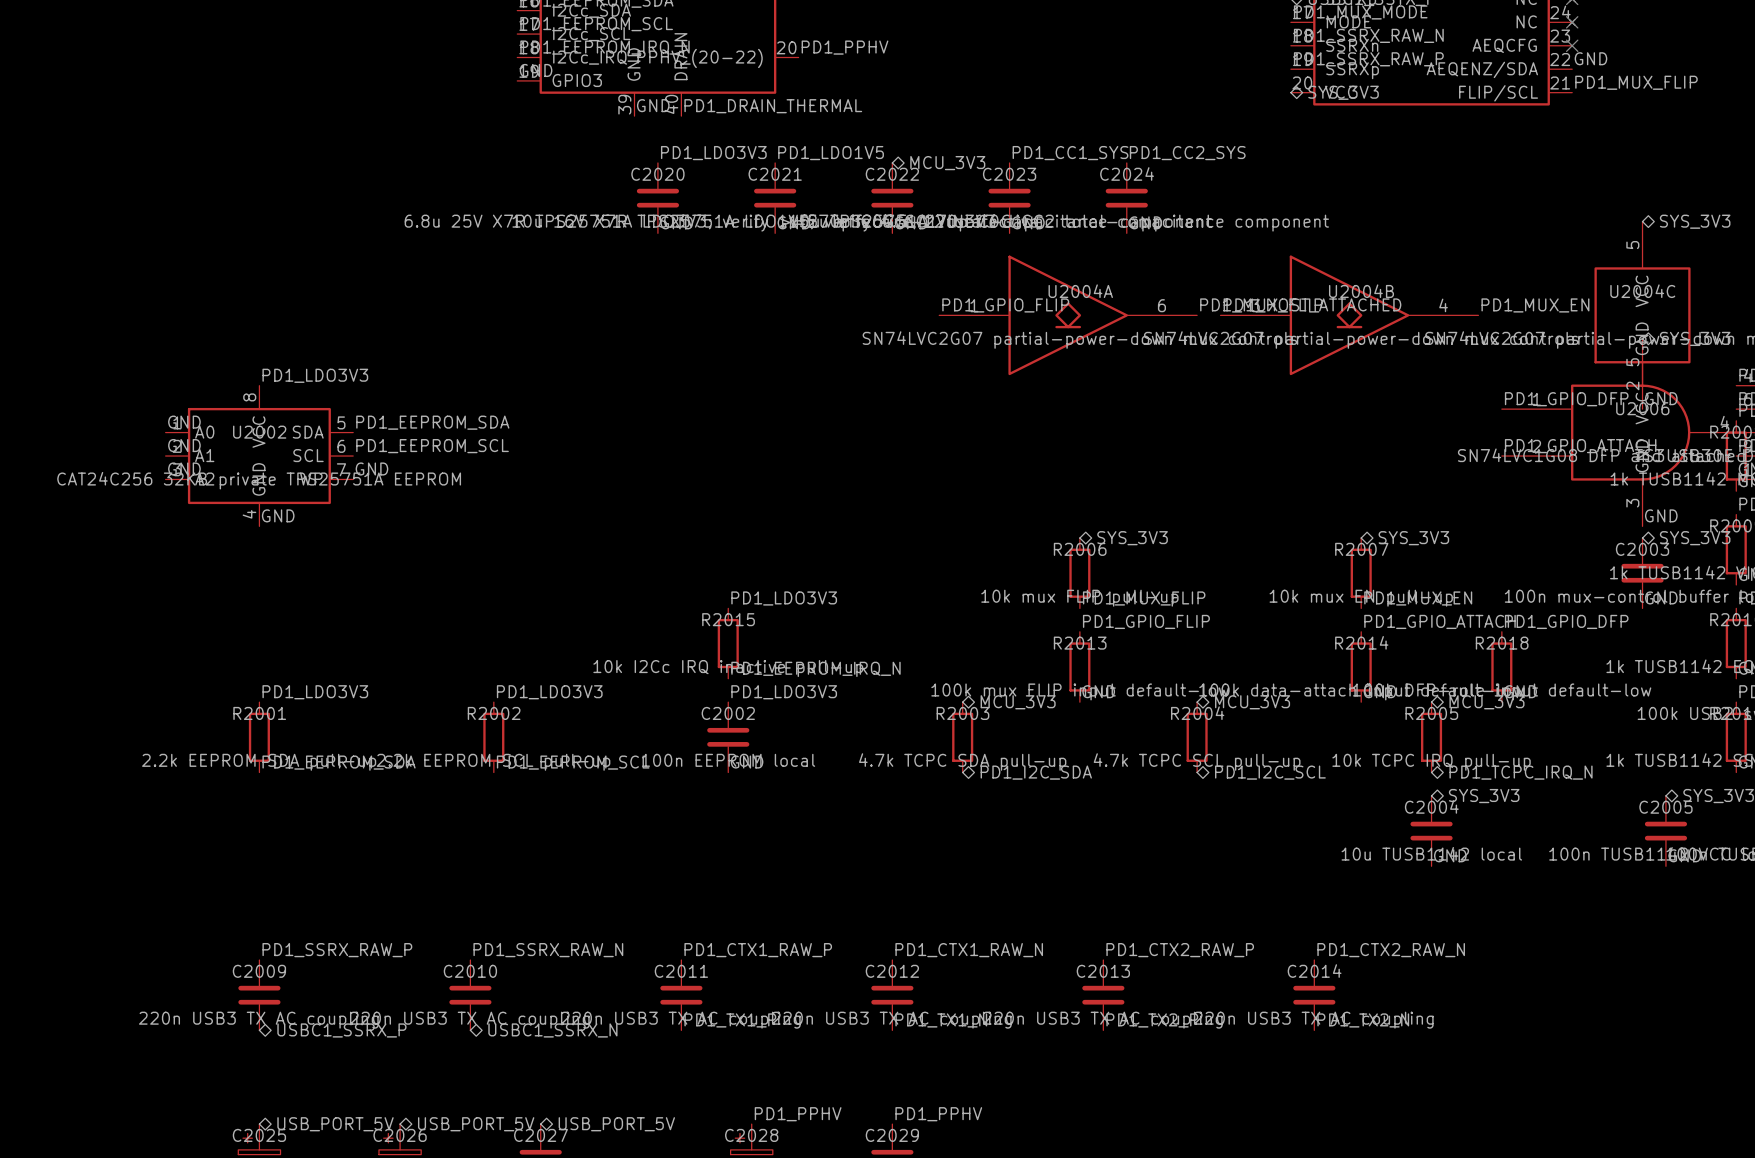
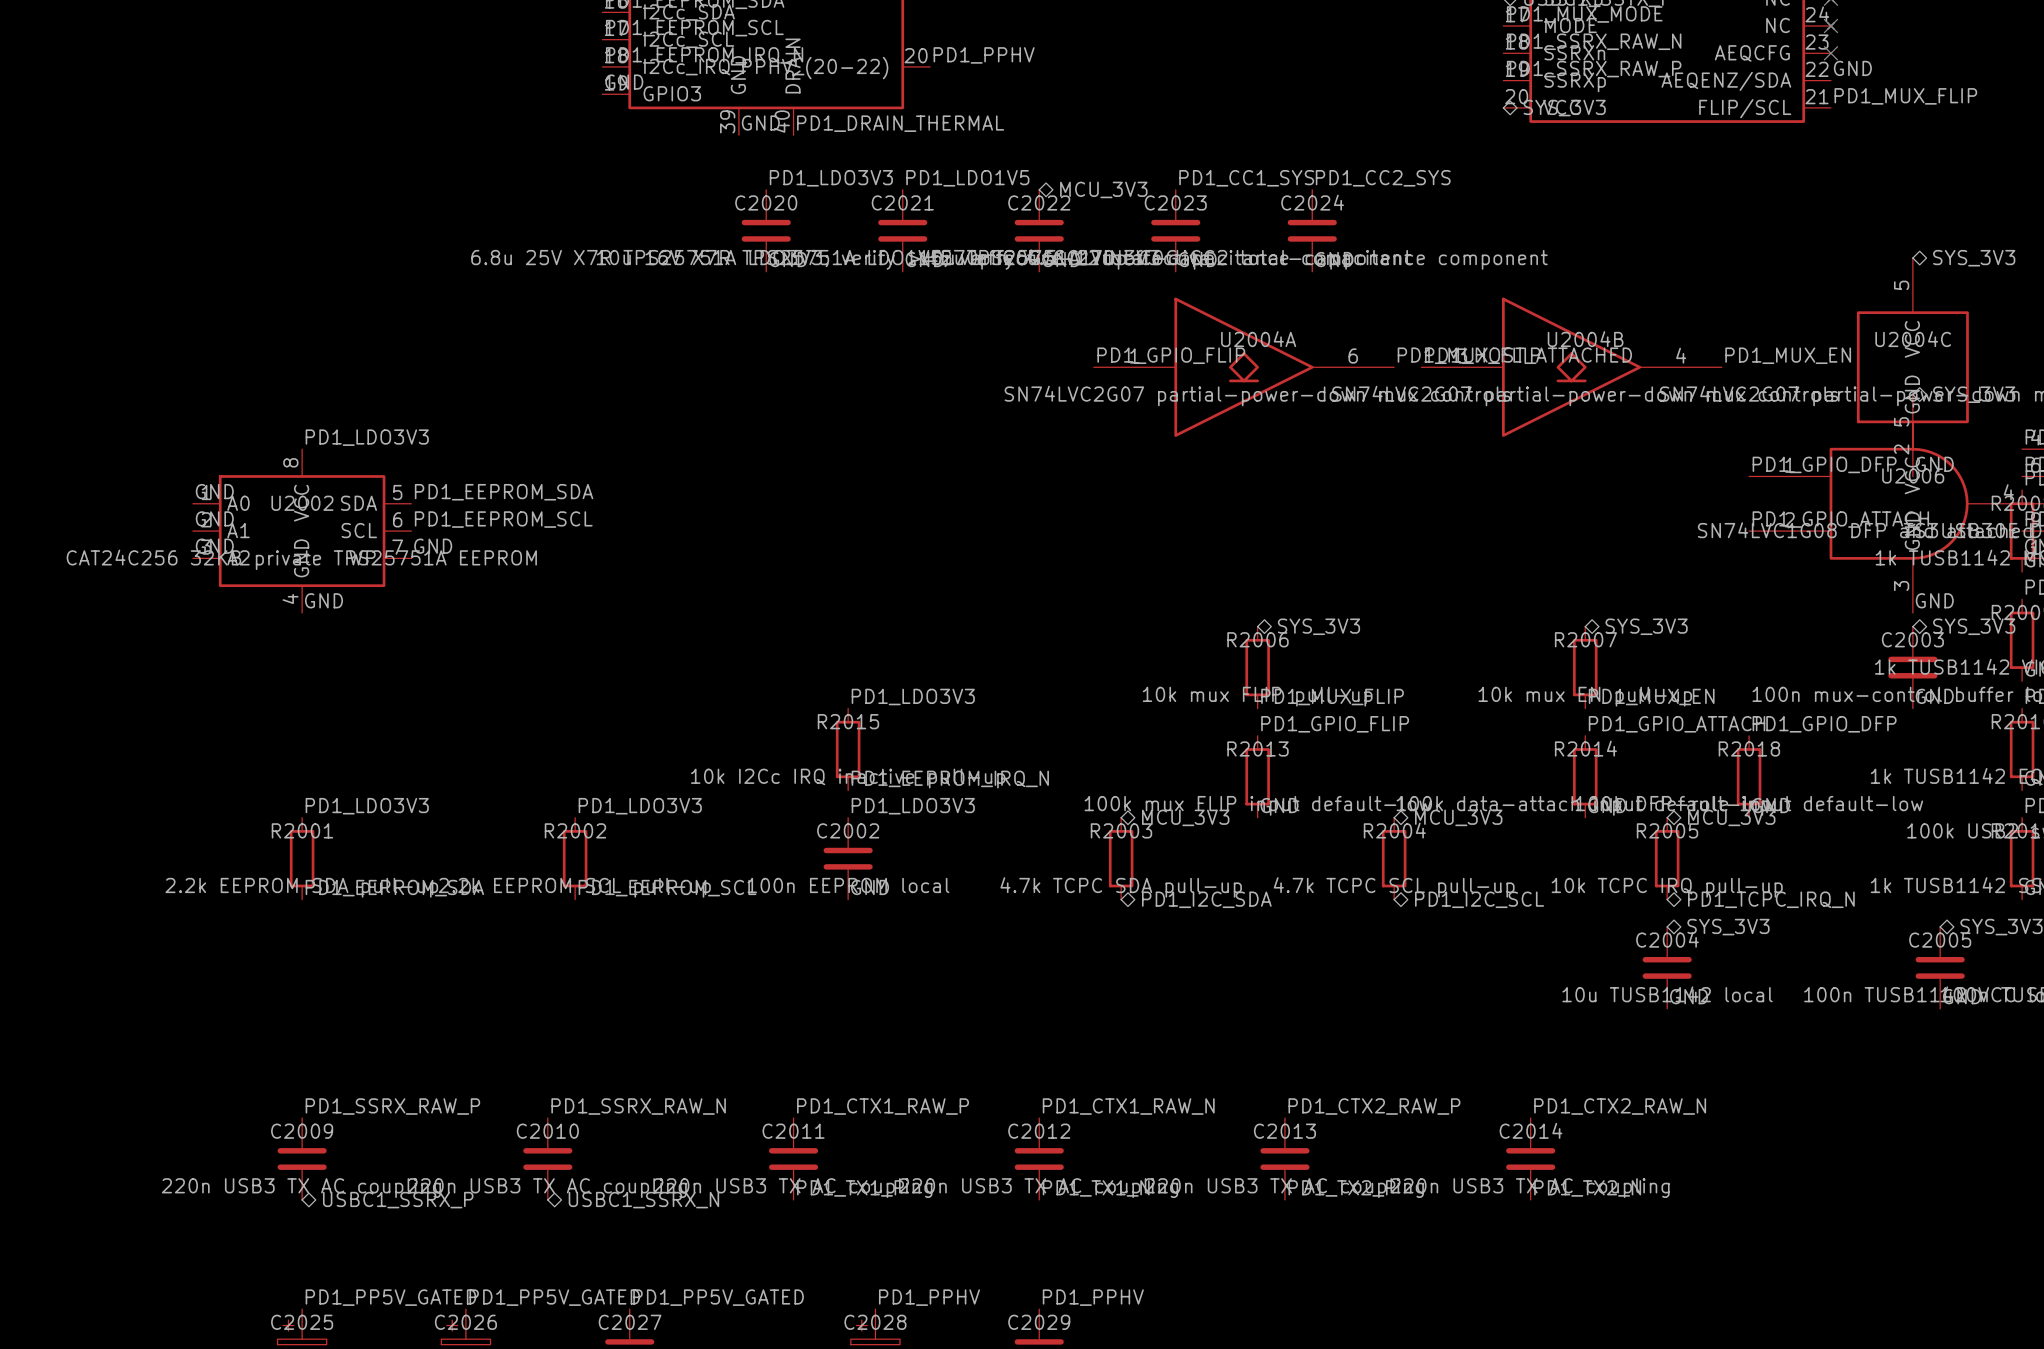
label: none -> PD1_PP5V_GATED (390, 1297)
label: none -> PD1_PP5V_GATED (554, 1297)
label: none -> PD1_PP5V_GATED (718, 1297)
hierarchical label: USB_PORT_5V (335, 1124) -> none
hierarchical label: USB_PORT_5V (476, 1124) -> none
hierarchical label: USB_PORT_5V (616, 1124) -> none

